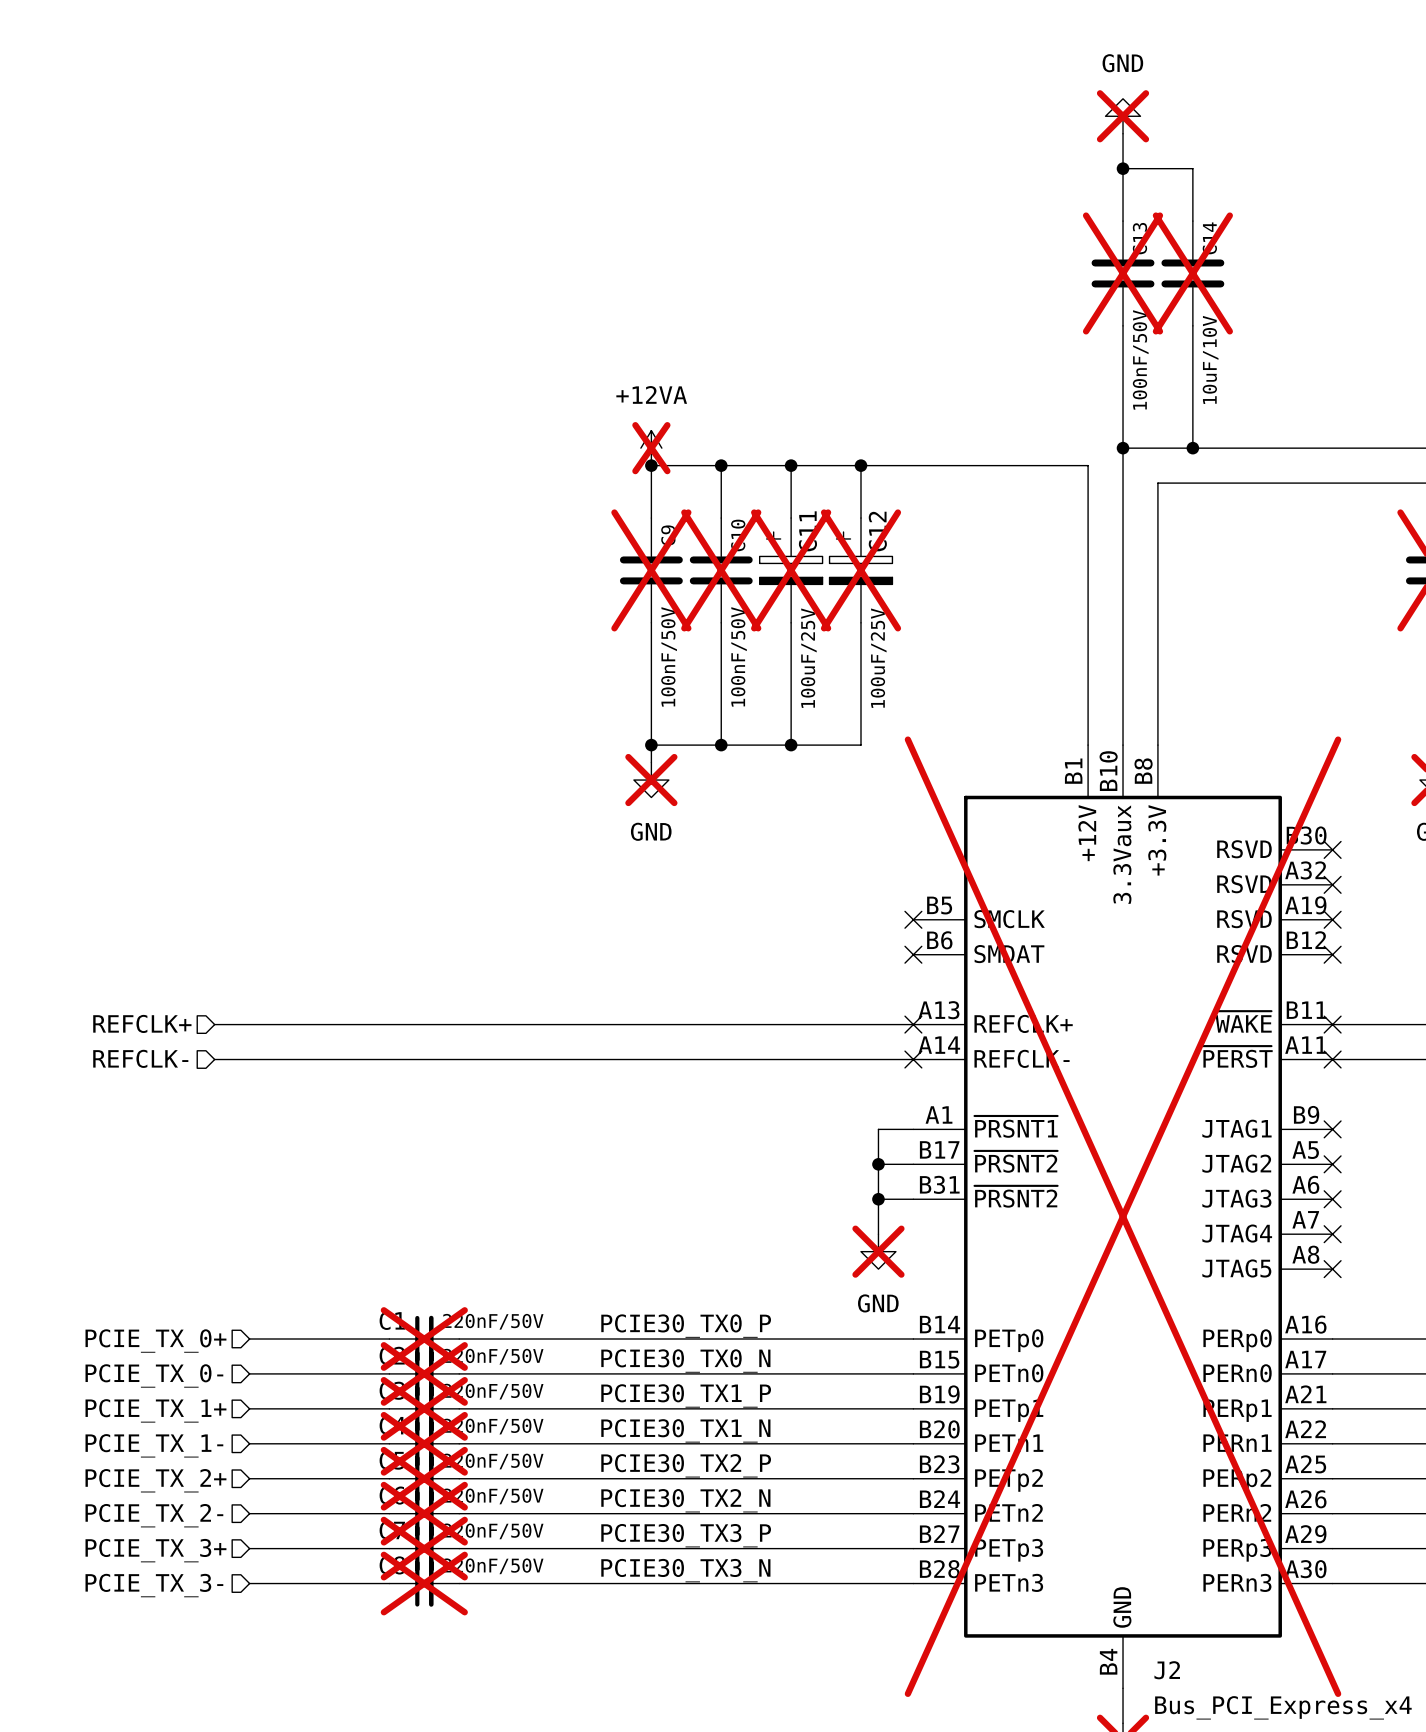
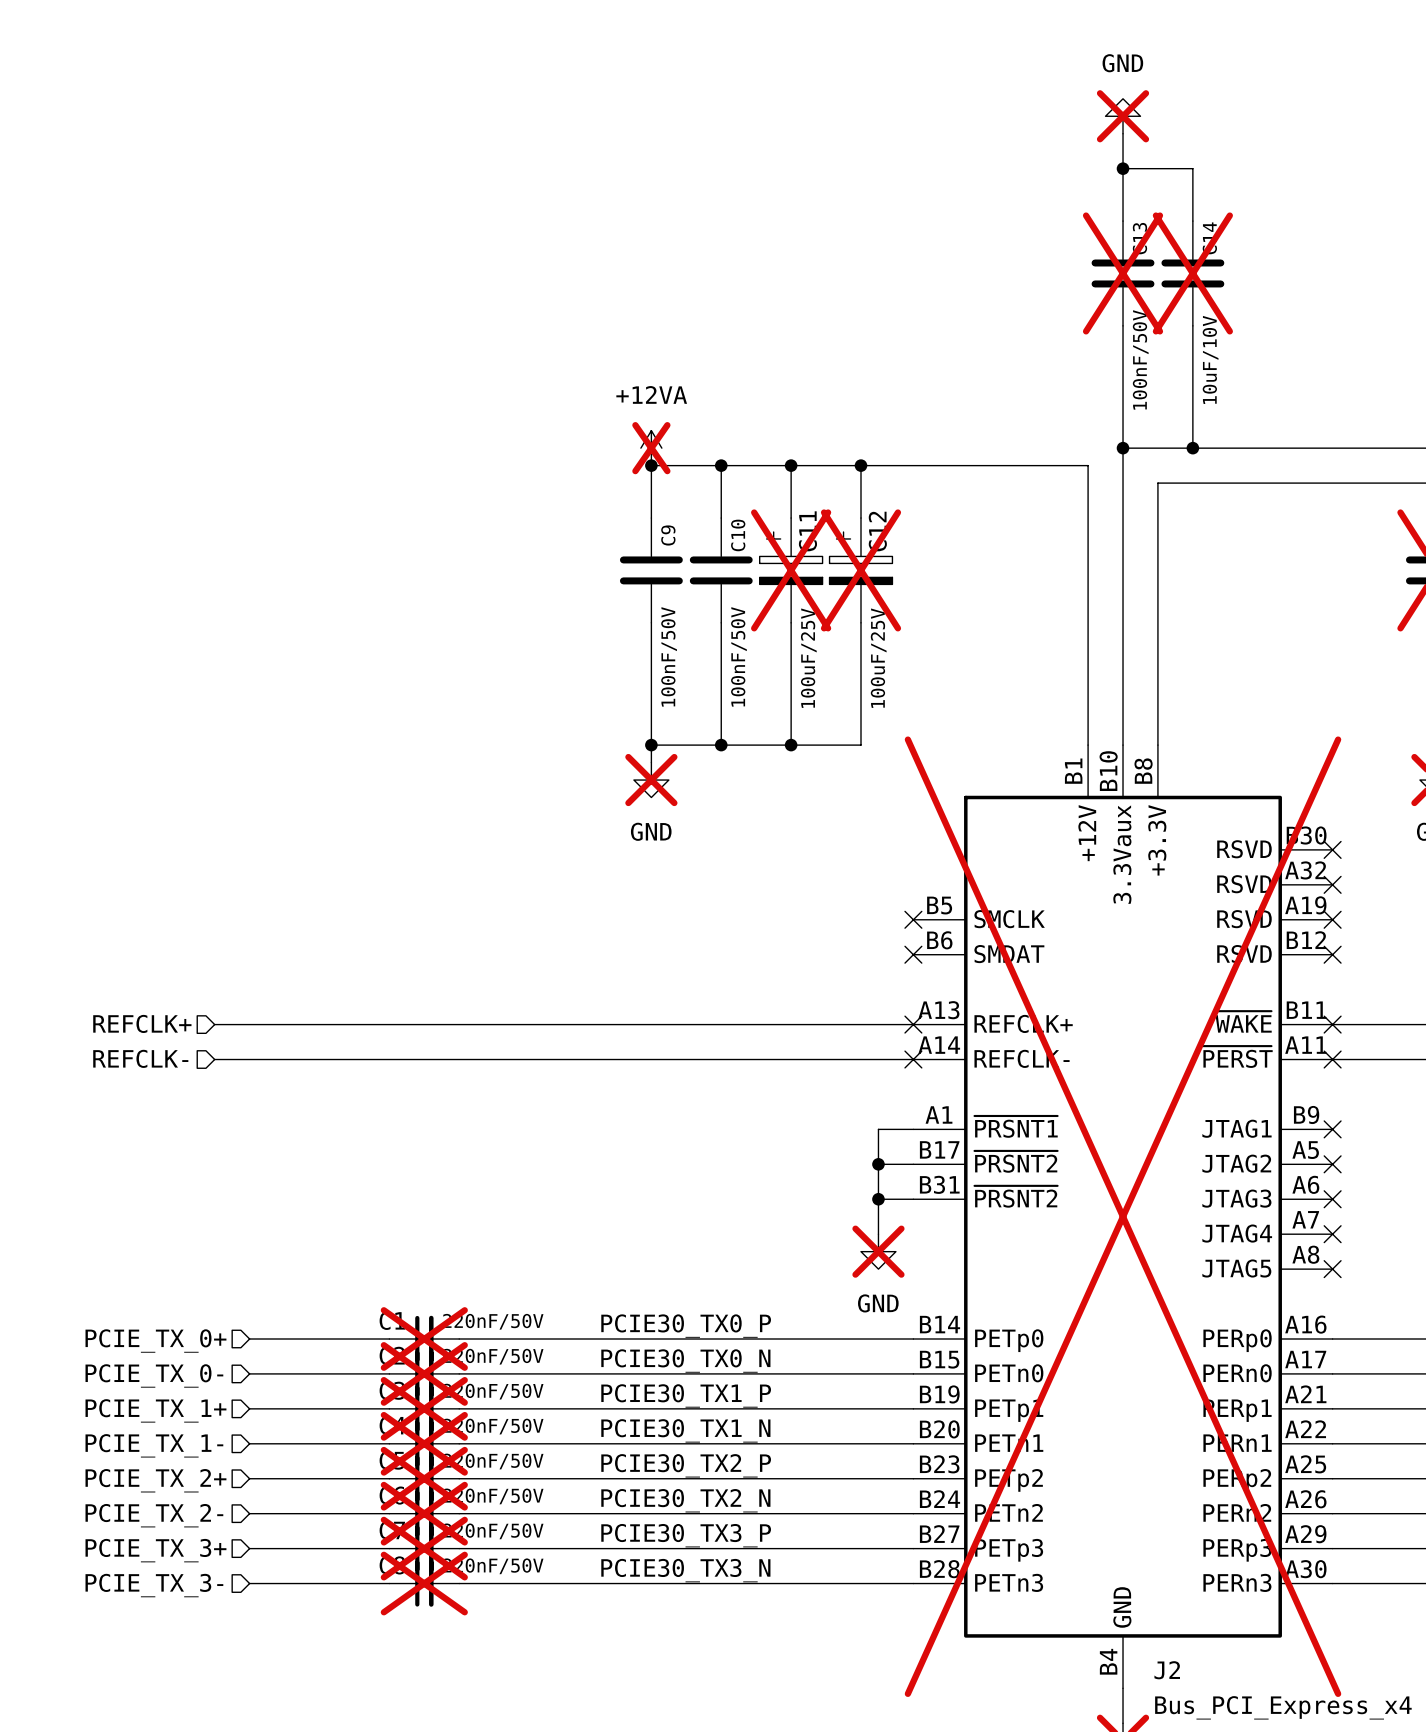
C9 do-not-place cross: (651, 570) -> none
C10 do-not-place cross: (721, 570) -> none

